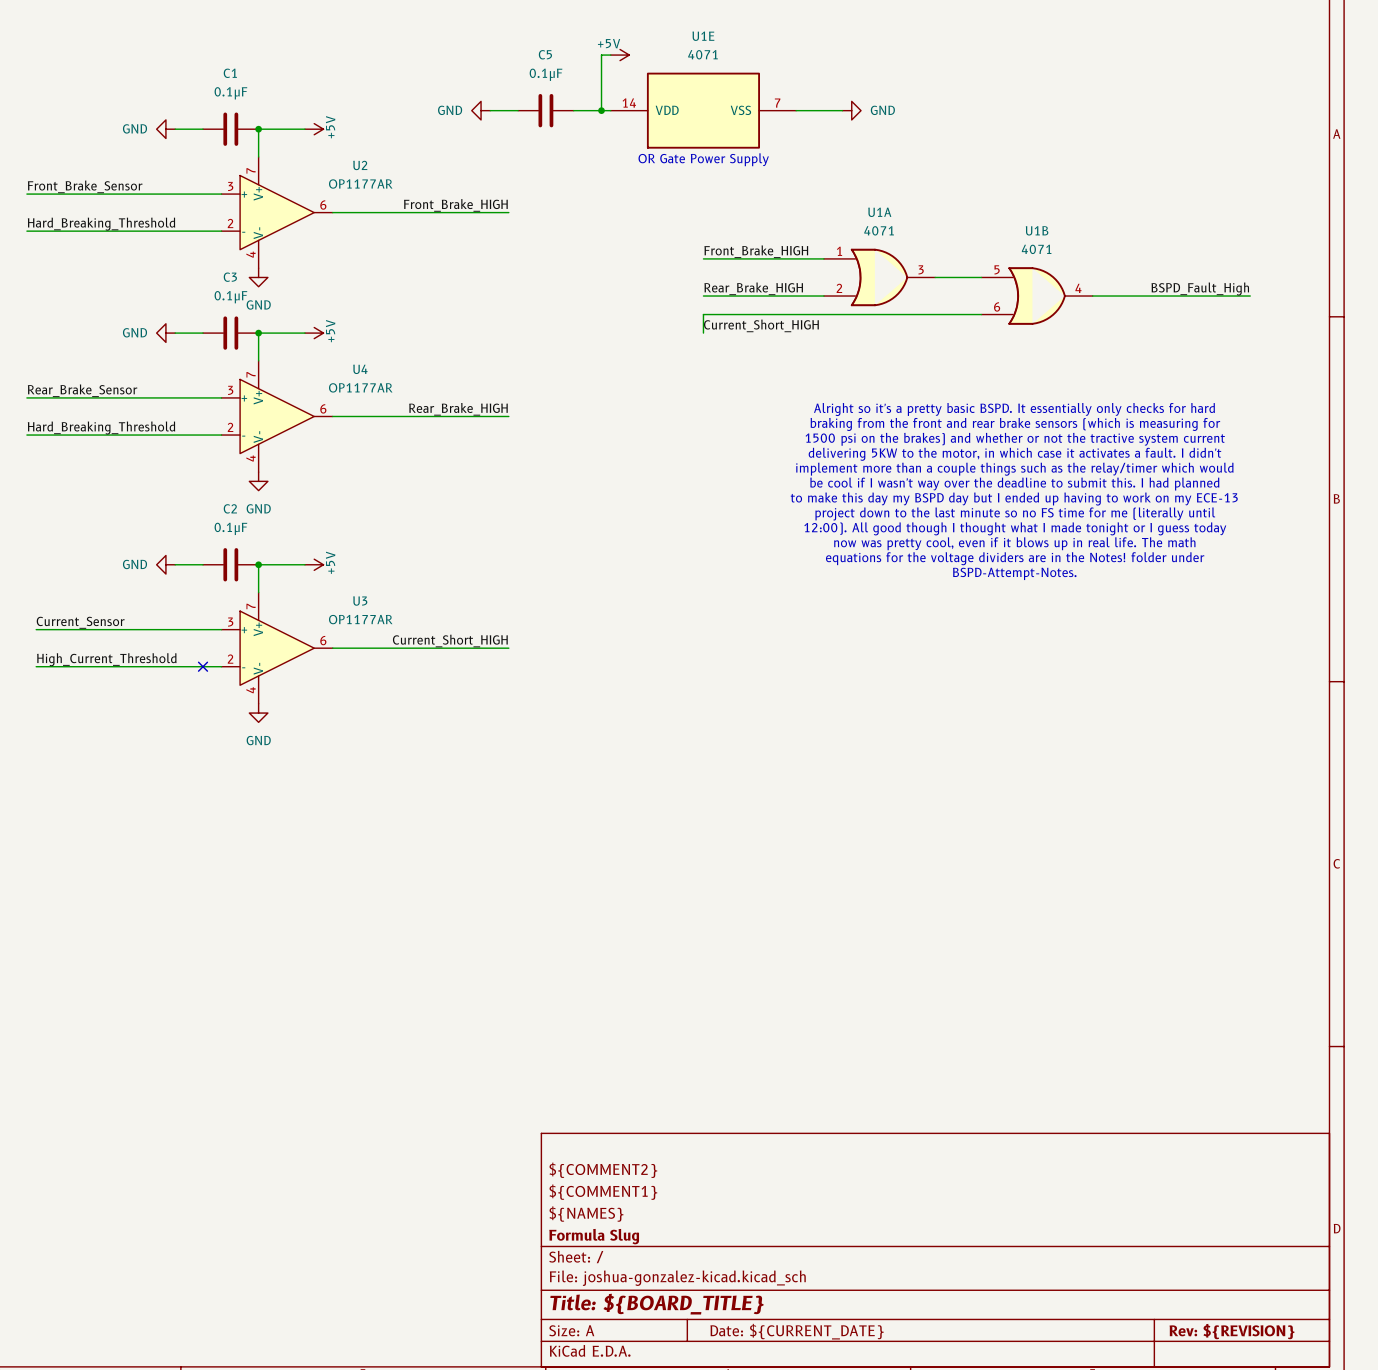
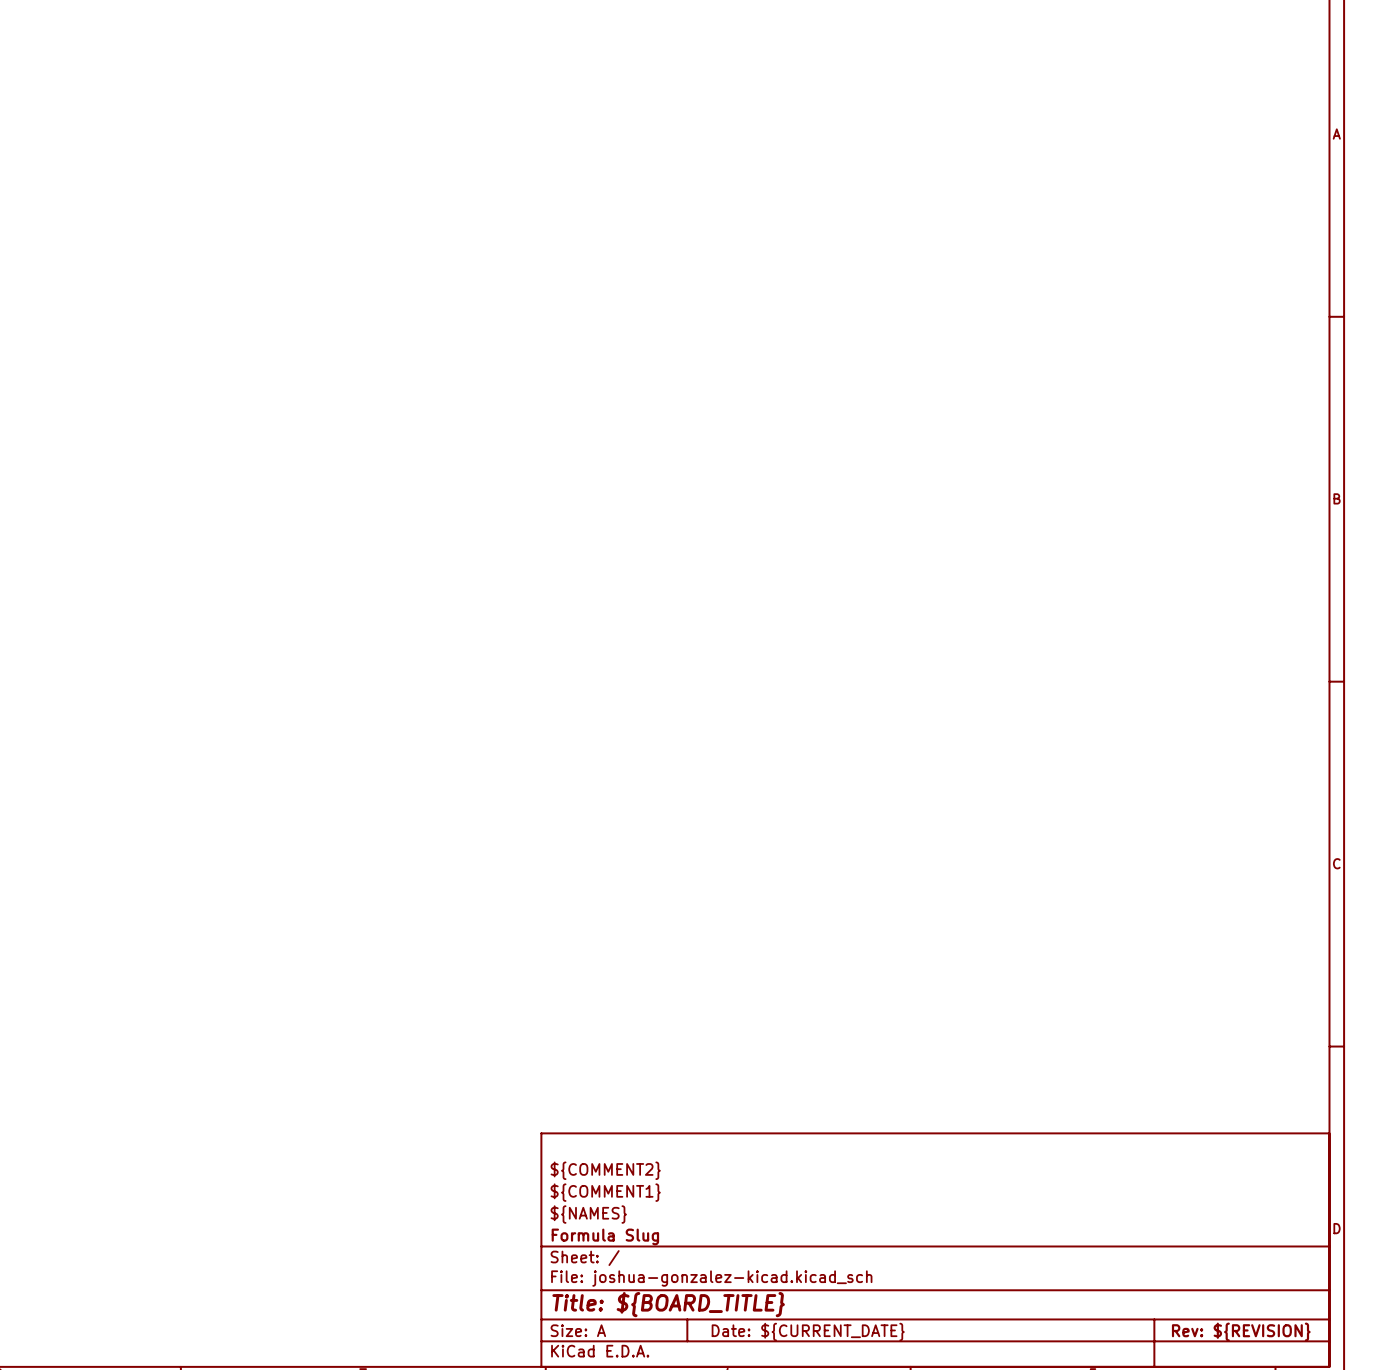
wire: (610, 55) (601, 55) (601, 110) -> none
power symbol: +5V (620, 55) -> none
power symbol: GND (481, 110) -> none
wire: (490, 110) (518, 110) -> none
C5: 0.1μF (545, 110) -> none
wire: (573, 110) (610, 110) -> none
junction: (601, 110) -> none
U1E: 4071 (703, 110) -> none
wire: (796, 110) (842, 110) -> none
power symbol: GND (851, 110) -> none
power symbol: GND (165, 129) -> none
wire: (175, 129) (203, 129) -> none
C1: 0.1μF (230, 129) -> none
junction: (258, 129) -> none
wire: (304, 129) (258, 129) (258, 156) -> none
power symbol: +5V (314, 129) -> none
text: OR Gate Power Supply (703, 159) -> none
label: Front_Brake_Sensor (85, 186) -> none
wire: (26, 194) (221, 194) -> none
label: Front_Brake_HIGH (455, 205) -> none
U2: OP1177AR (277, 212) -> none
wire: (332, 212) (508, 212) -> none
label: Hard_Breaking_Threshold (101, 224) -> none
wire: (26, 231) (221, 231) -> none
label: Front_Brake_HIGH (756, 251) -> none
wire: (703, 258) (823, 258) -> none
power symbol: GND (258, 277) -> none
U1A: 4071 (879, 277) -> none
wire: (935, 277) (981, 277) -> none
label: Rear_Brake_HIGH (753, 288) -> none
label: BSPD_Fault_High (1200, 289) -> none
wire: (703, 296) (823, 296) -> none
U1B: 4071 (1037, 296) -> none
wire: (1092, 296) (1250, 296) -> none
wire: (981, 314) (703, 314) (703, 333) -> none
label: Current_Short_HIGH (761, 325) -> none
power symbol: GND (165, 333) -> none
wire: (175, 333) (203, 333) -> none
C3: 0.1μF (230, 333) -> none
junction: (258, 333) -> none
wire: (304, 333) (258, 333) (258, 360) -> none
power symbol: +5V (314, 333) -> none
label: Rear_Brake_Sensor (82, 390) -> none
wire: (26, 397) (221, 397) -> none
label: Rear_Brake_HIGH (458, 409) -> none
text: Alright so it's a pretty basic BSPD. It essentially only checks for hard (1014, 409) -> none
U4: OP1177AR (277, 416) -> none
wire: (332, 416) (508, 416) -> none
text: braking from the front and rear brake sensors (which is measuring for (1015, 424) -> none
label: Hard_Breaking_Threshold (101, 428) -> none
wire: (26, 435) (221, 435) -> none
text: 1500 psi on the brakes) and whether or not the tractive system current (1015, 439) -> none
text: delivering 5KW to the motor, in which case it activates a fault. I didn't (1014, 454) -> none
text: implement more than a couple things such as the relay/timer which would (1014, 469) -> none
power symbol: GND (258, 481) -> none
text: be cool if I wasn't way over the deadline to submit this. I had planned (1014, 484) -> none
text: to make this day my BSPD day but I ended up having to work on my ECE-13 (1014, 499) -> none
text: project down to the last minute so no FS time for me (literally until (1015, 513) -> none
text: 12:00). All good though I thought what I made tonight or I guess today (1015, 528) -> none
text: now was pretty cool, even if it blows up in real life. The math (1014, 543) -> none
text: equations for the voltage dividers are in the Notes! folder under (1015, 558) -> none
power symbol: GND (165, 564) -> none
wire: (175, 564) (203, 564) -> none
C2: 0.1μF (230, 564) -> none
junction: (258, 564) -> none
wire: (304, 564) (258, 564) (258, 592) -> none
power symbol: +5V (314, 564) -> none
text: BSPD-Attempt-Notes. (1014, 573) -> none
label: Current_Sensor (80, 622) -> none
wire: (36, 629) (221, 629) -> none
label: Current_Short_HIGH (450, 640) -> none
U3: OP1177AR (277, 648) -> none
wire: (332, 648) (508, 648) -> none
label: High_Current_Threshold (106, 659) -> none
wire: (36, 666) (221, 666) -> none
no-connect mark: (203, 666) -> none
power symbol: GND (258, 713) -> none

